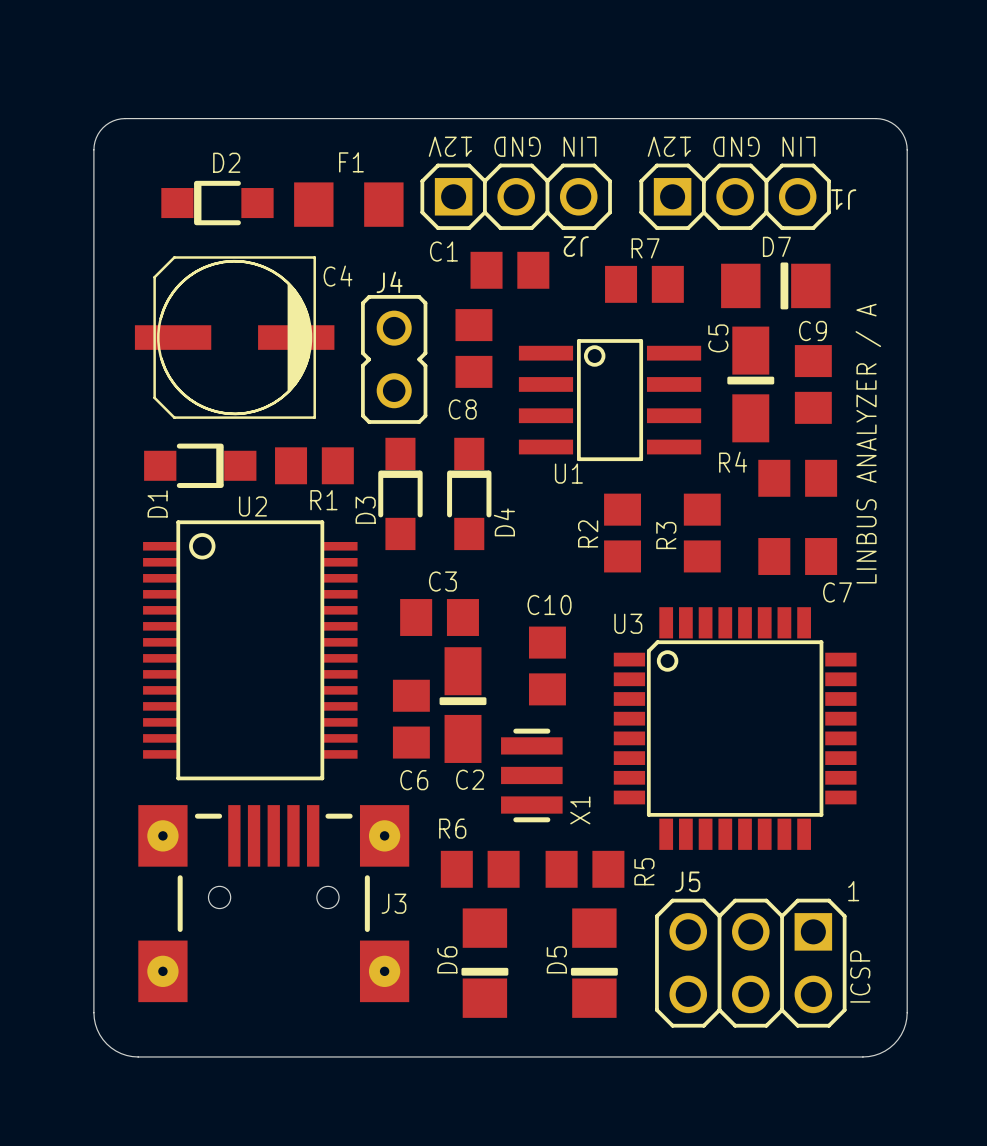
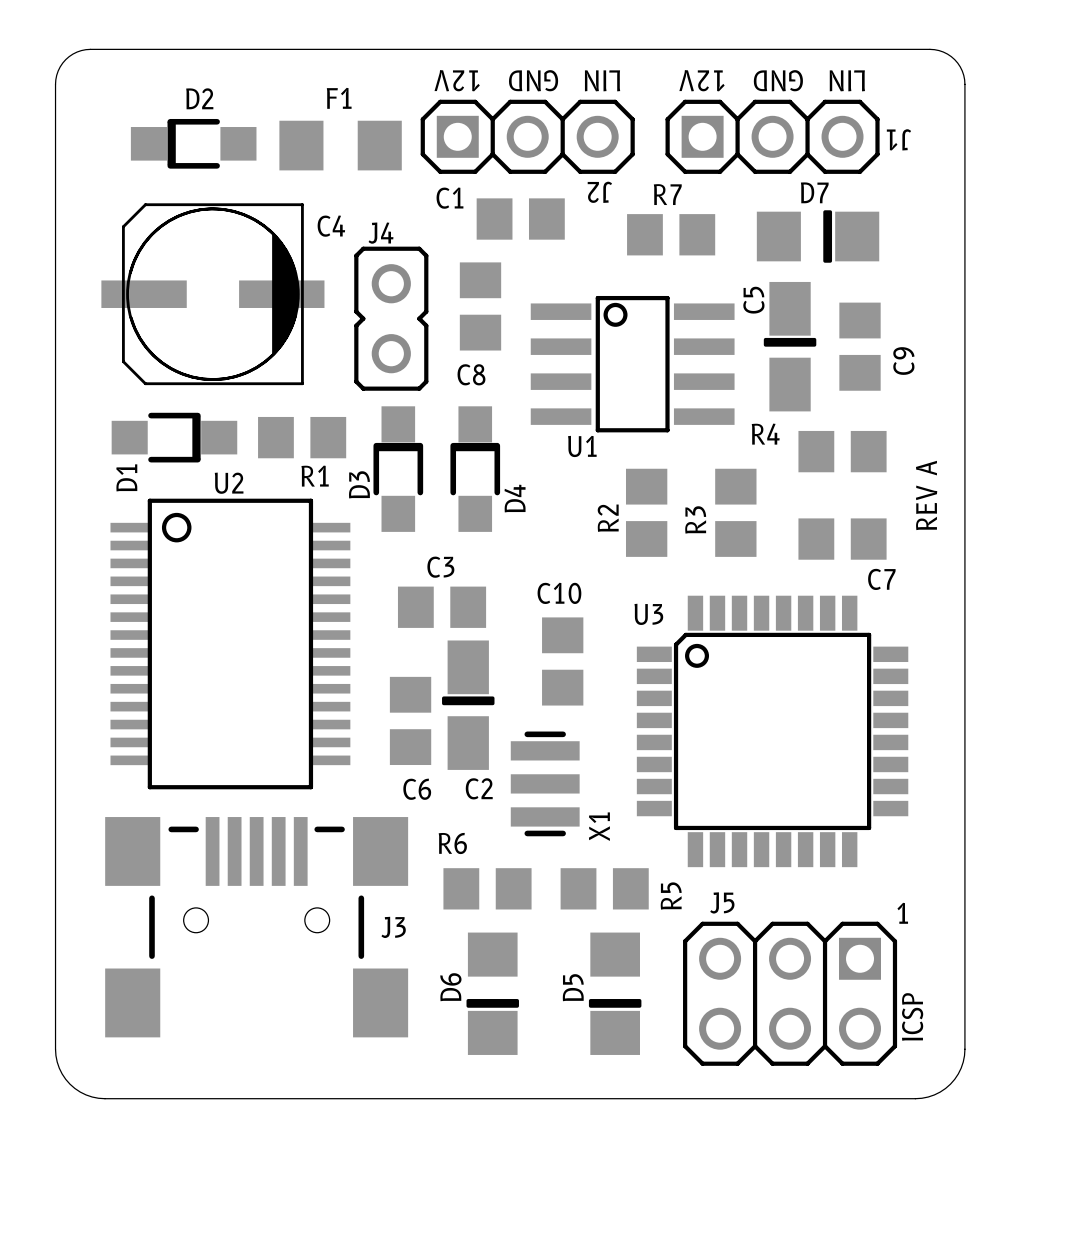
C9 name rotation: 0° (812, 330) -> 90° counterclockwise (903, 361)
C9 name position: C9 (812, 330) -> C9 (903, 361)
text: LINBUS ANALYZER / A (868, 443) -> none
text: none -> REV A (926, 495)
J3 footprint: [138, 805, 410, 1003] -> [105, 817, 409, 1038]

